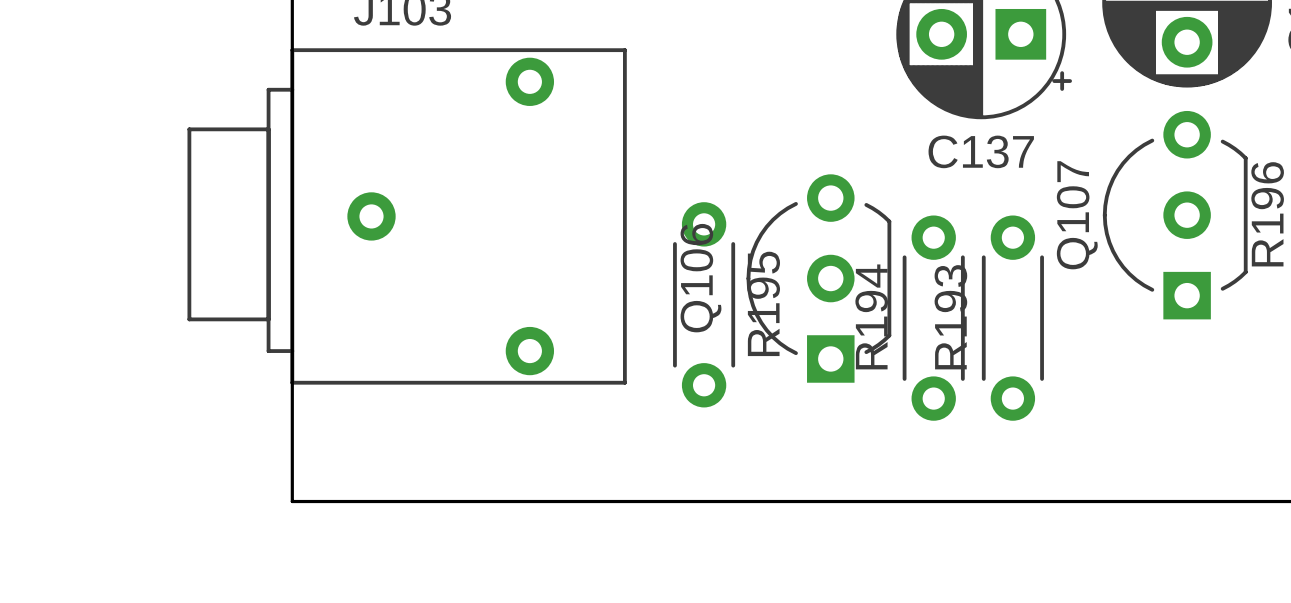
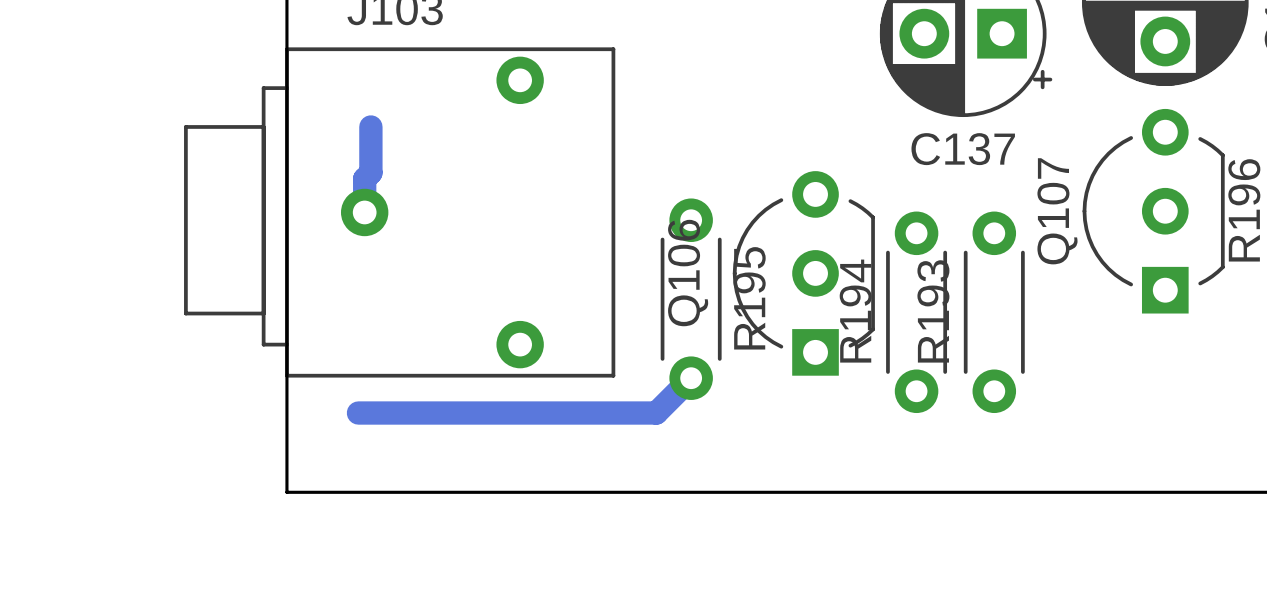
bottom track: none -> (370, 126) (370, 172) (364, 178) (364, 212)
bottom track: none -> (691, 378) (656, 413) (358, 413)

